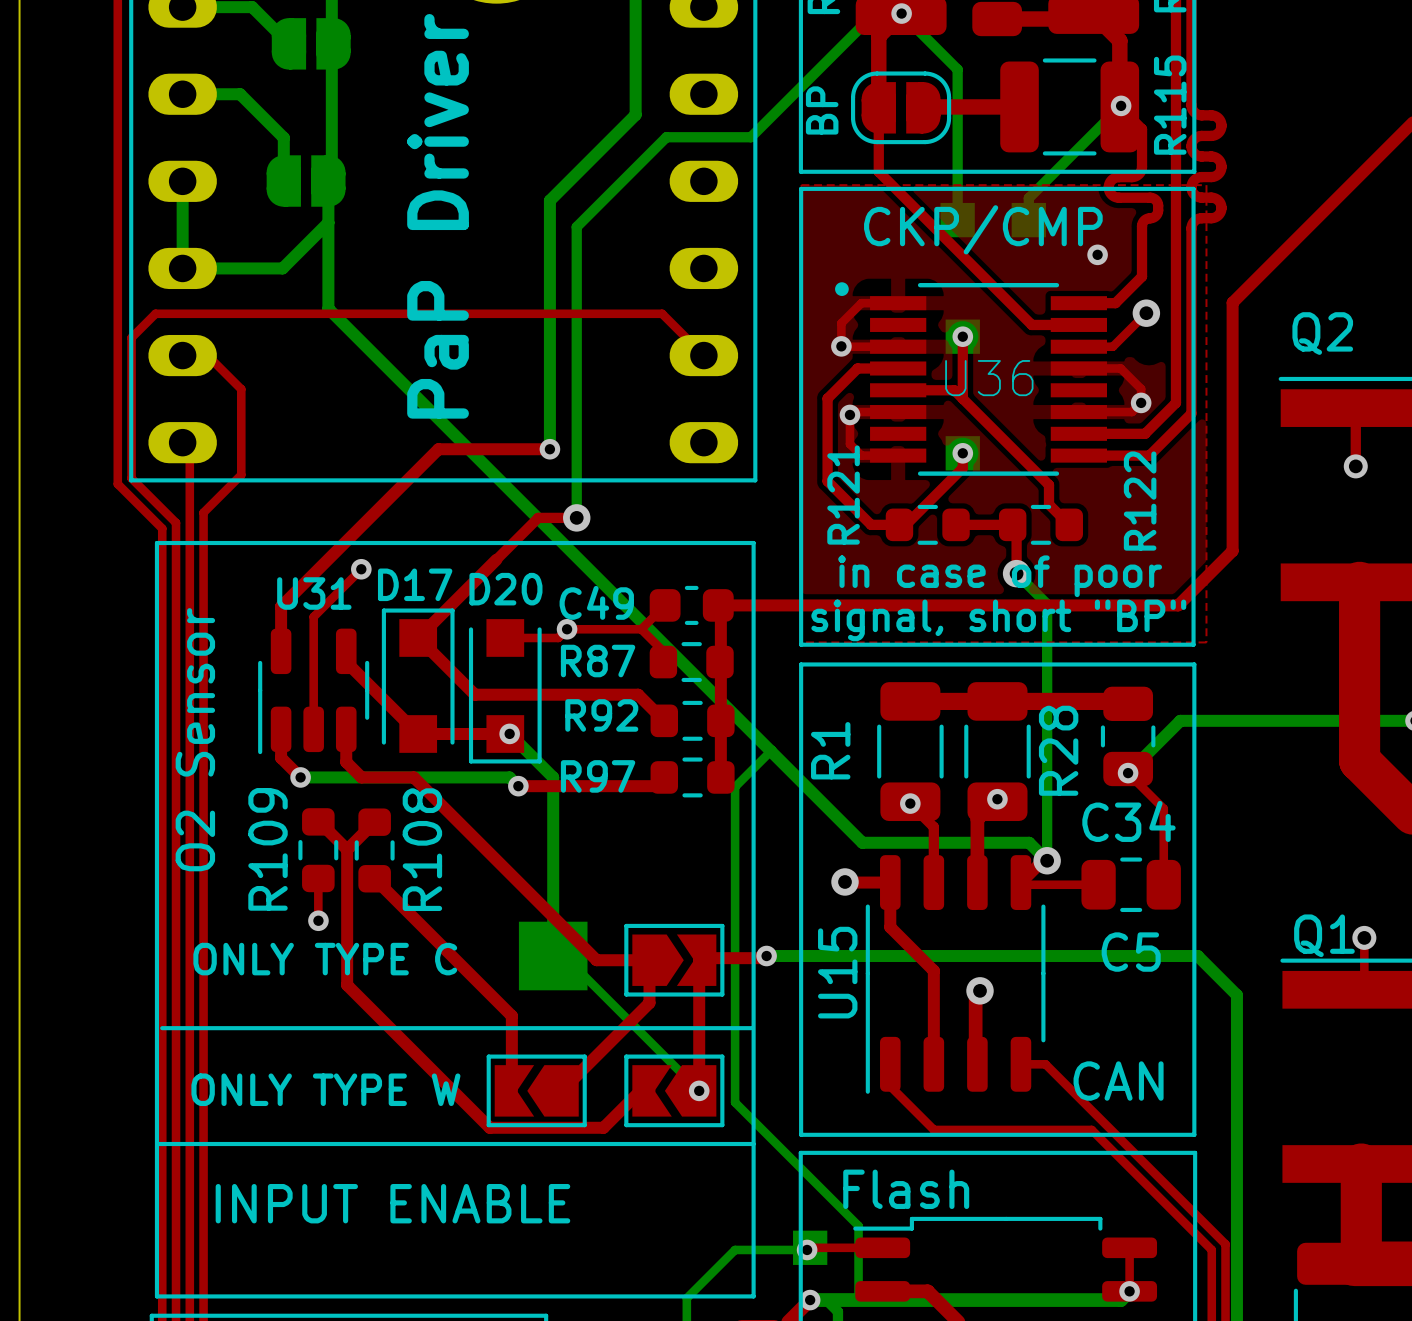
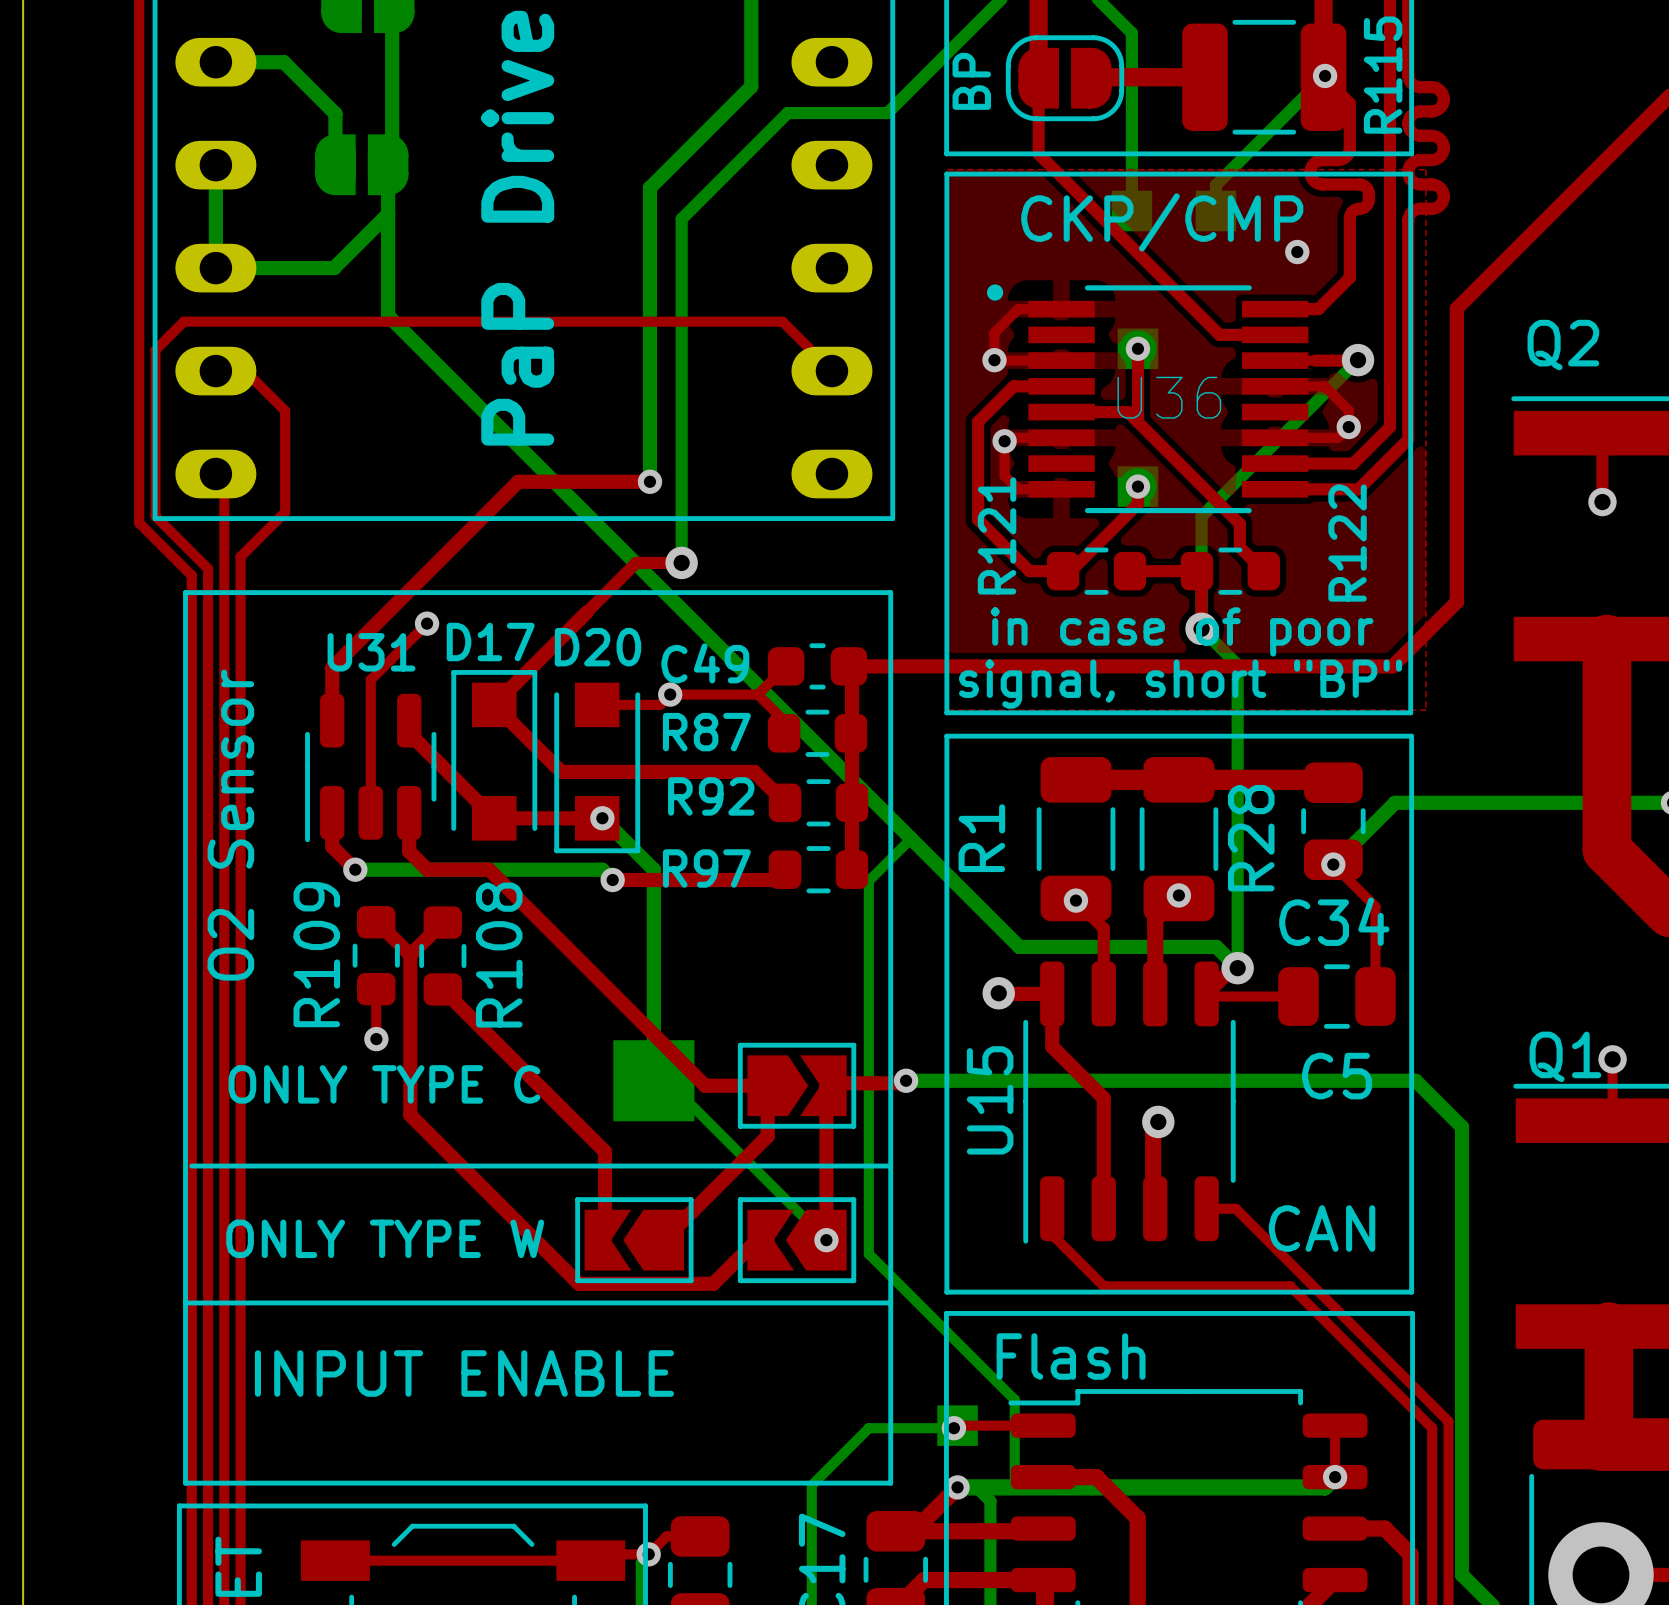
top track: (1146, 313) (1112, 346) -> (1357, 360) (1315, 360)
via position: (1146, 313) -> (1358, 360)
bottom track: none -> (1358, 360) (1201, 516) (1201, 628)

